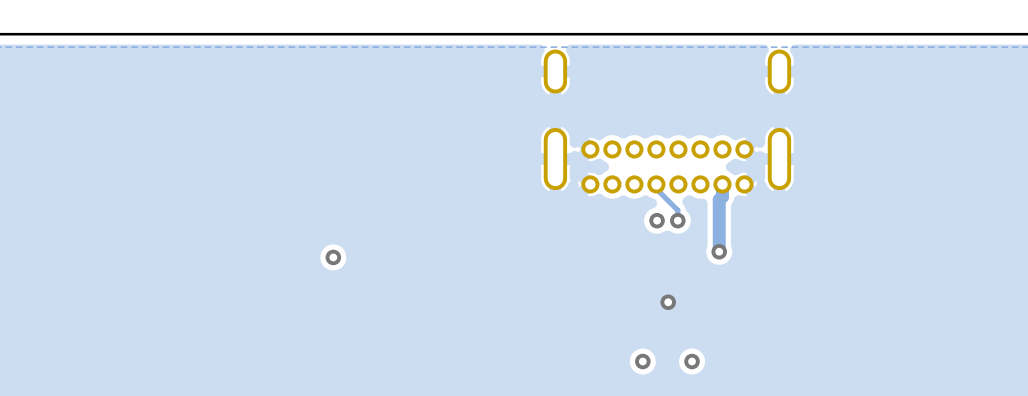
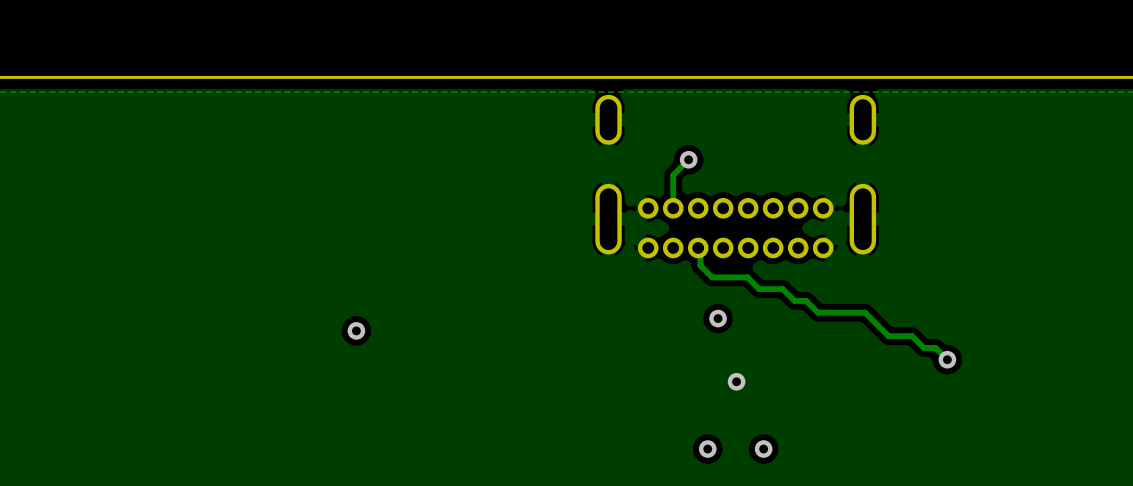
track: none -> (688, 159) (673, 175) (673, 208)
via: none -> (688, 159)
track: none -> (698, 247) (700, 250) (700, 265) (712, 277) (747, 277) (759, 289) (782, 289) (794, 300) (806, 300) (818, 312) (865, 312) (888, 336) (912, 336) (923, 347) (935, 347) (947, 359)
track: (656, 184) (657, 189) (677, 210) (677, 220) -> none
track: (722, 184) (722, 196) (719, 199) (719, 251) -> none
via: (657, 220) -> none
via: (677, 220) -> none
via: none -> (718, 318)
via: (719, 251) -> none
via: none -> (947, 359)

